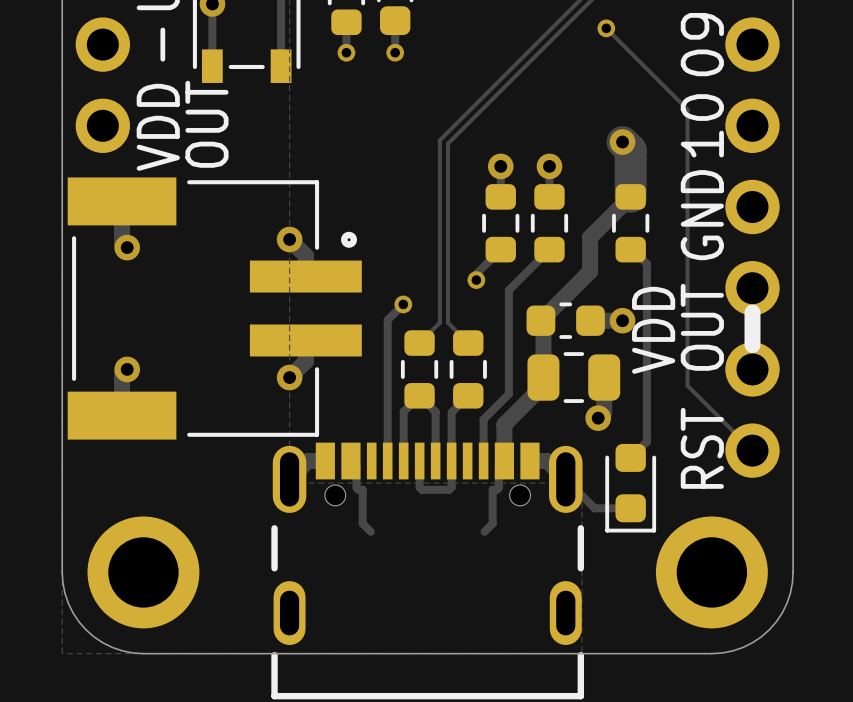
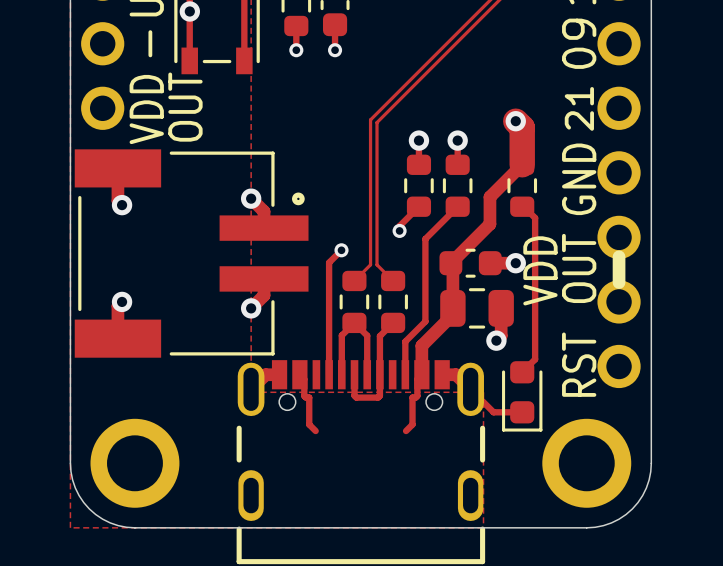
track: (606, 28) (687, 109) (687, 385) (752, 450) -> none
via: (606, 28) -> none
text: 10 (702, 125) -> 21 (579, 108)

